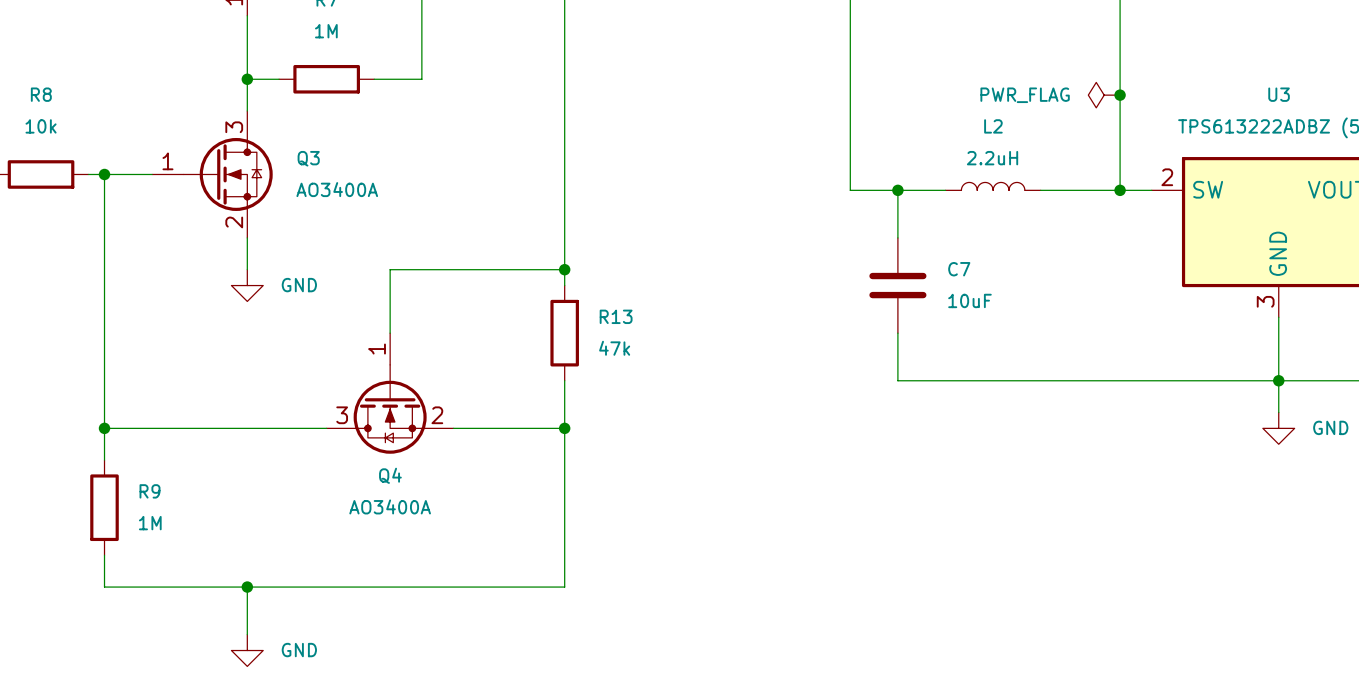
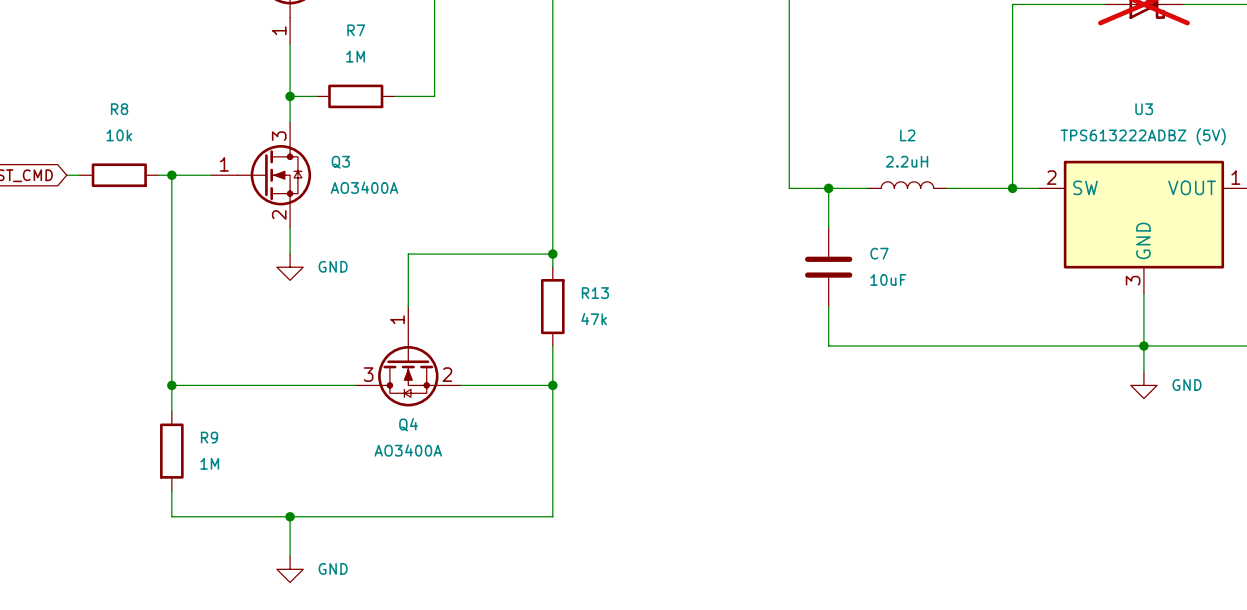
power symbol: PWR_FLAG (1104, 95) -> none
junction: (1120, 95) -> none

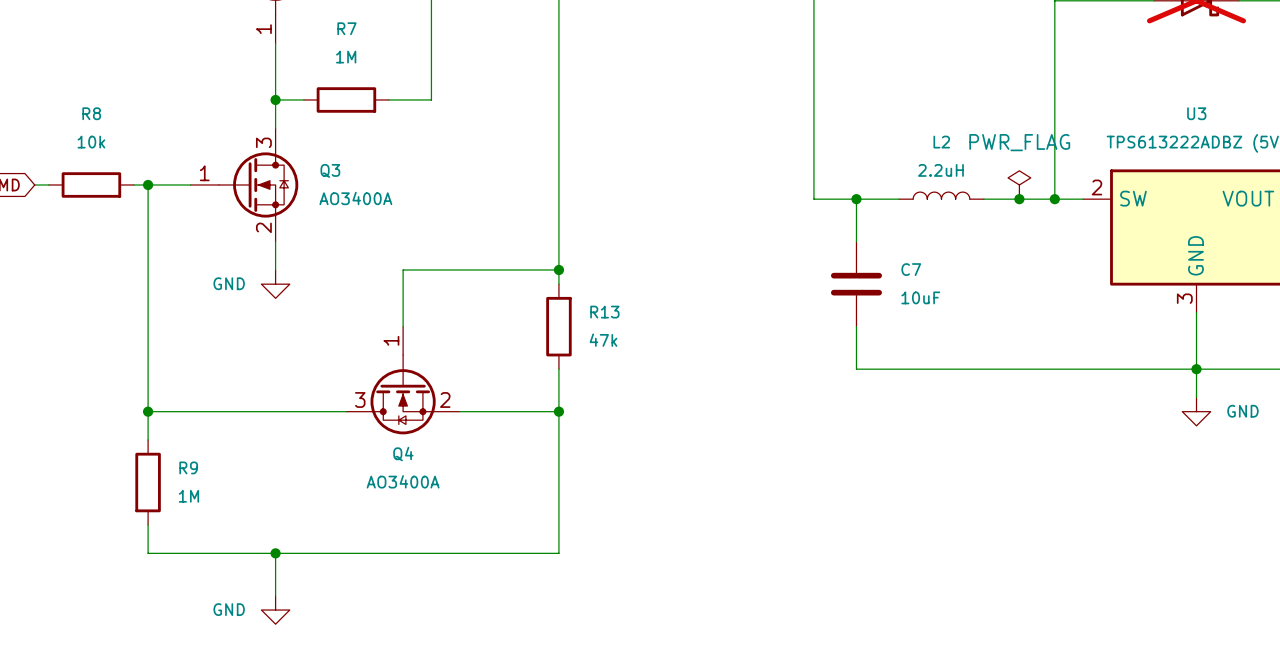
power symbol: none -> PWR_FLAG (1019, 184)
junction: none -> (1019, 199)
power symbol text position: GND (333, 266) -> GND (229, 283)
power symbol text position: GND (333, 568) -> GND (229, 609)

